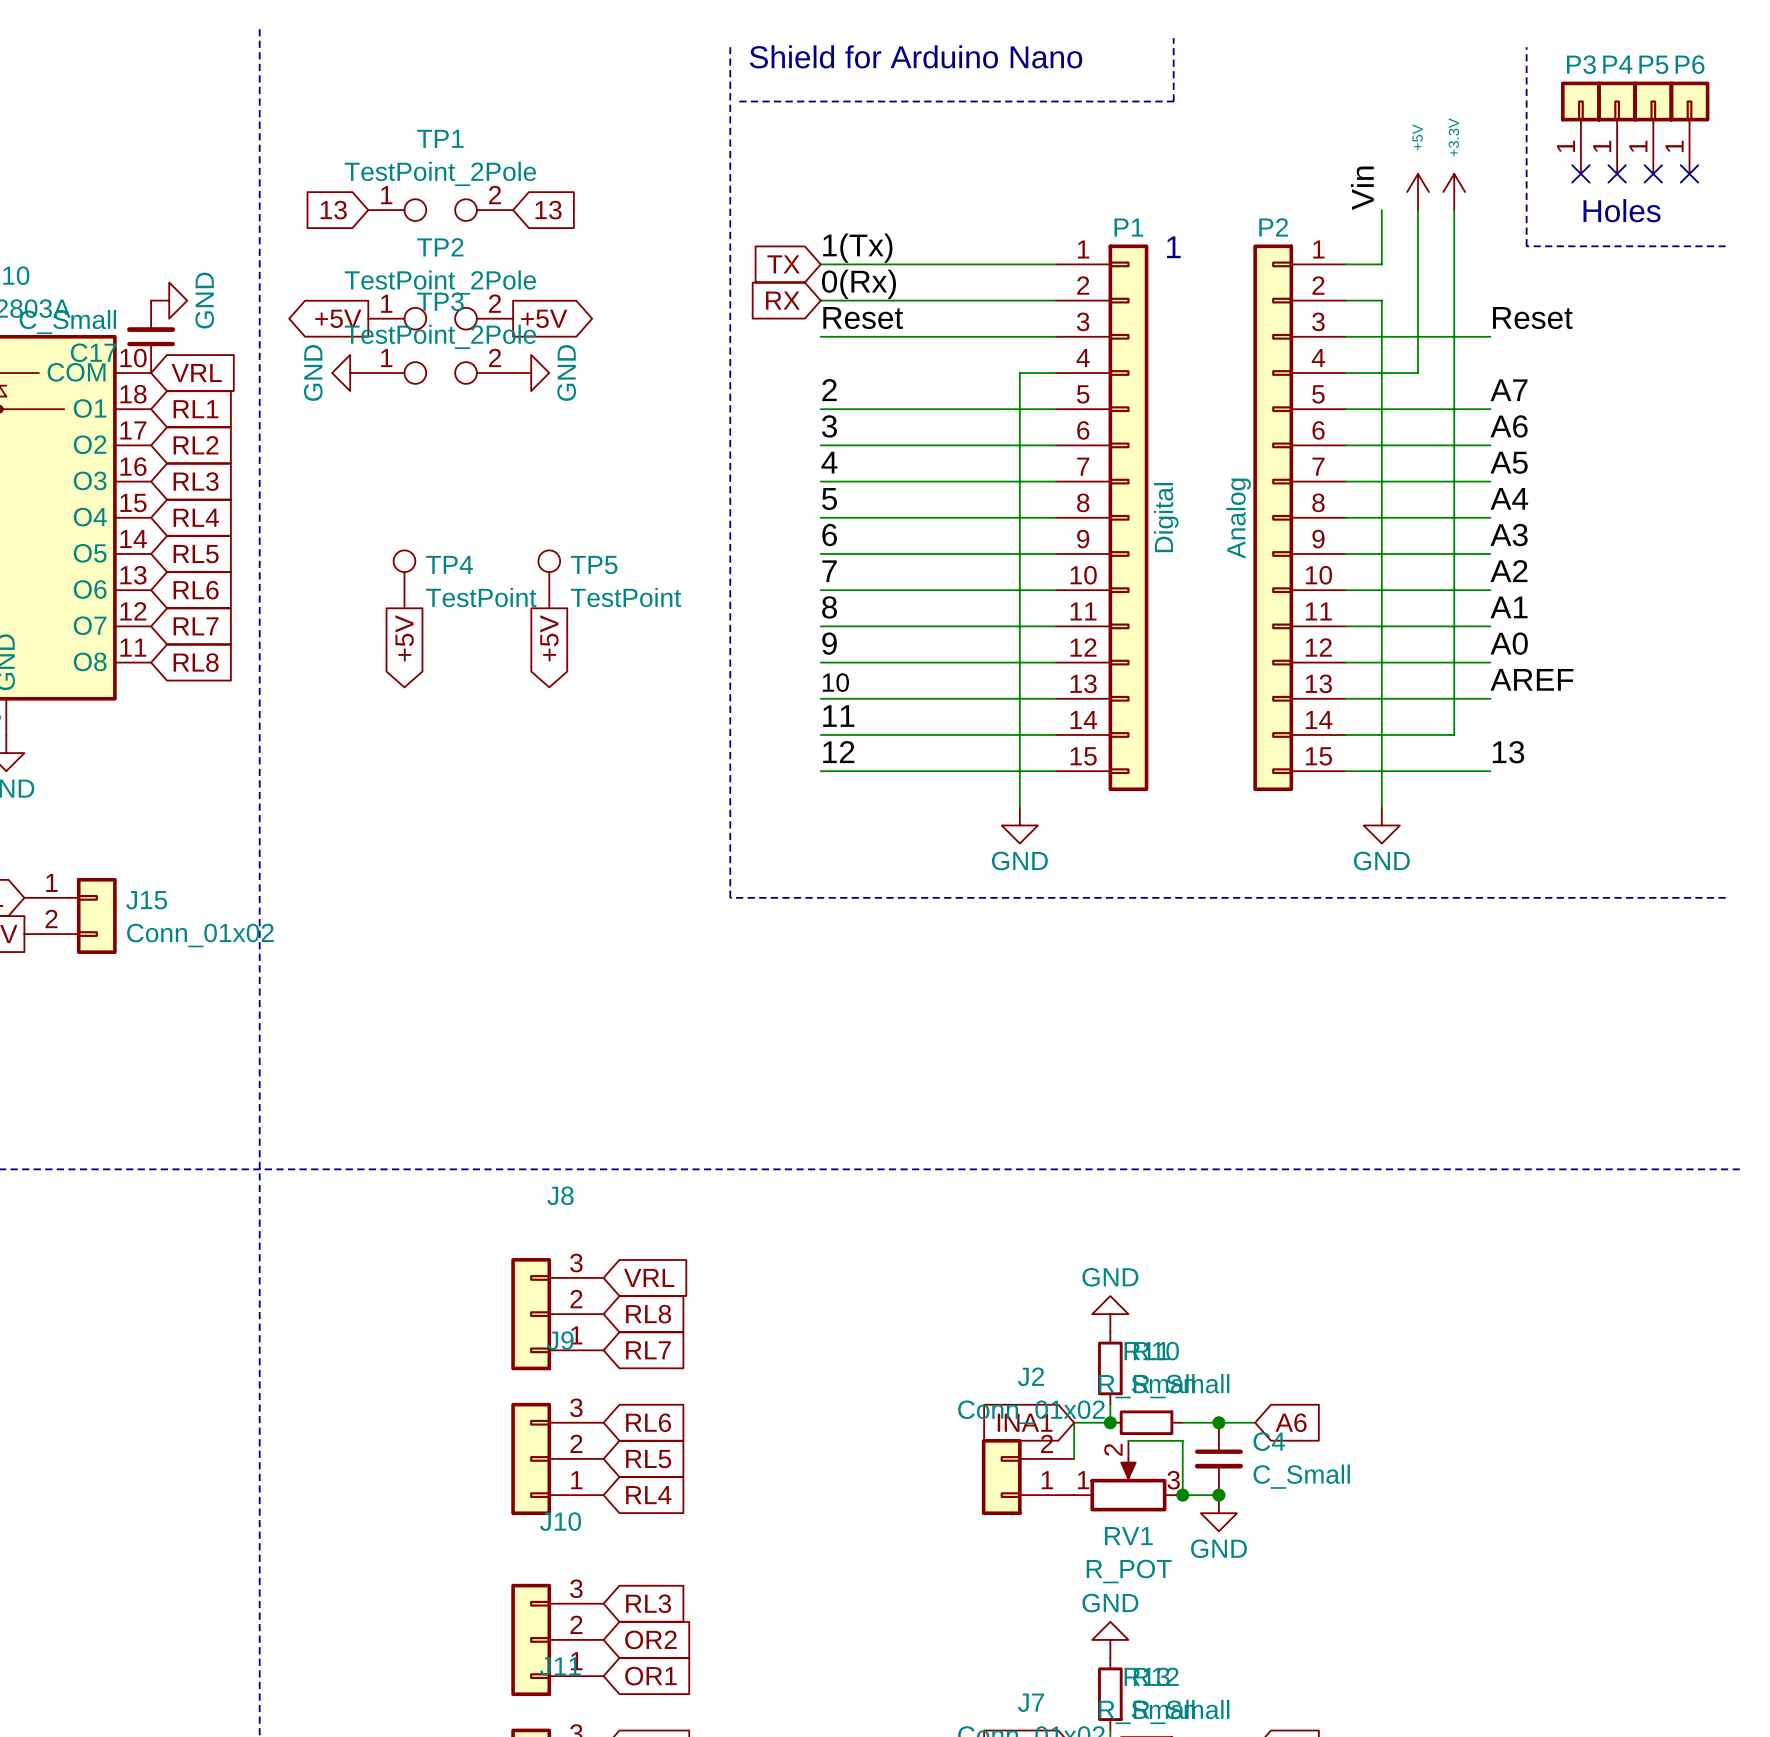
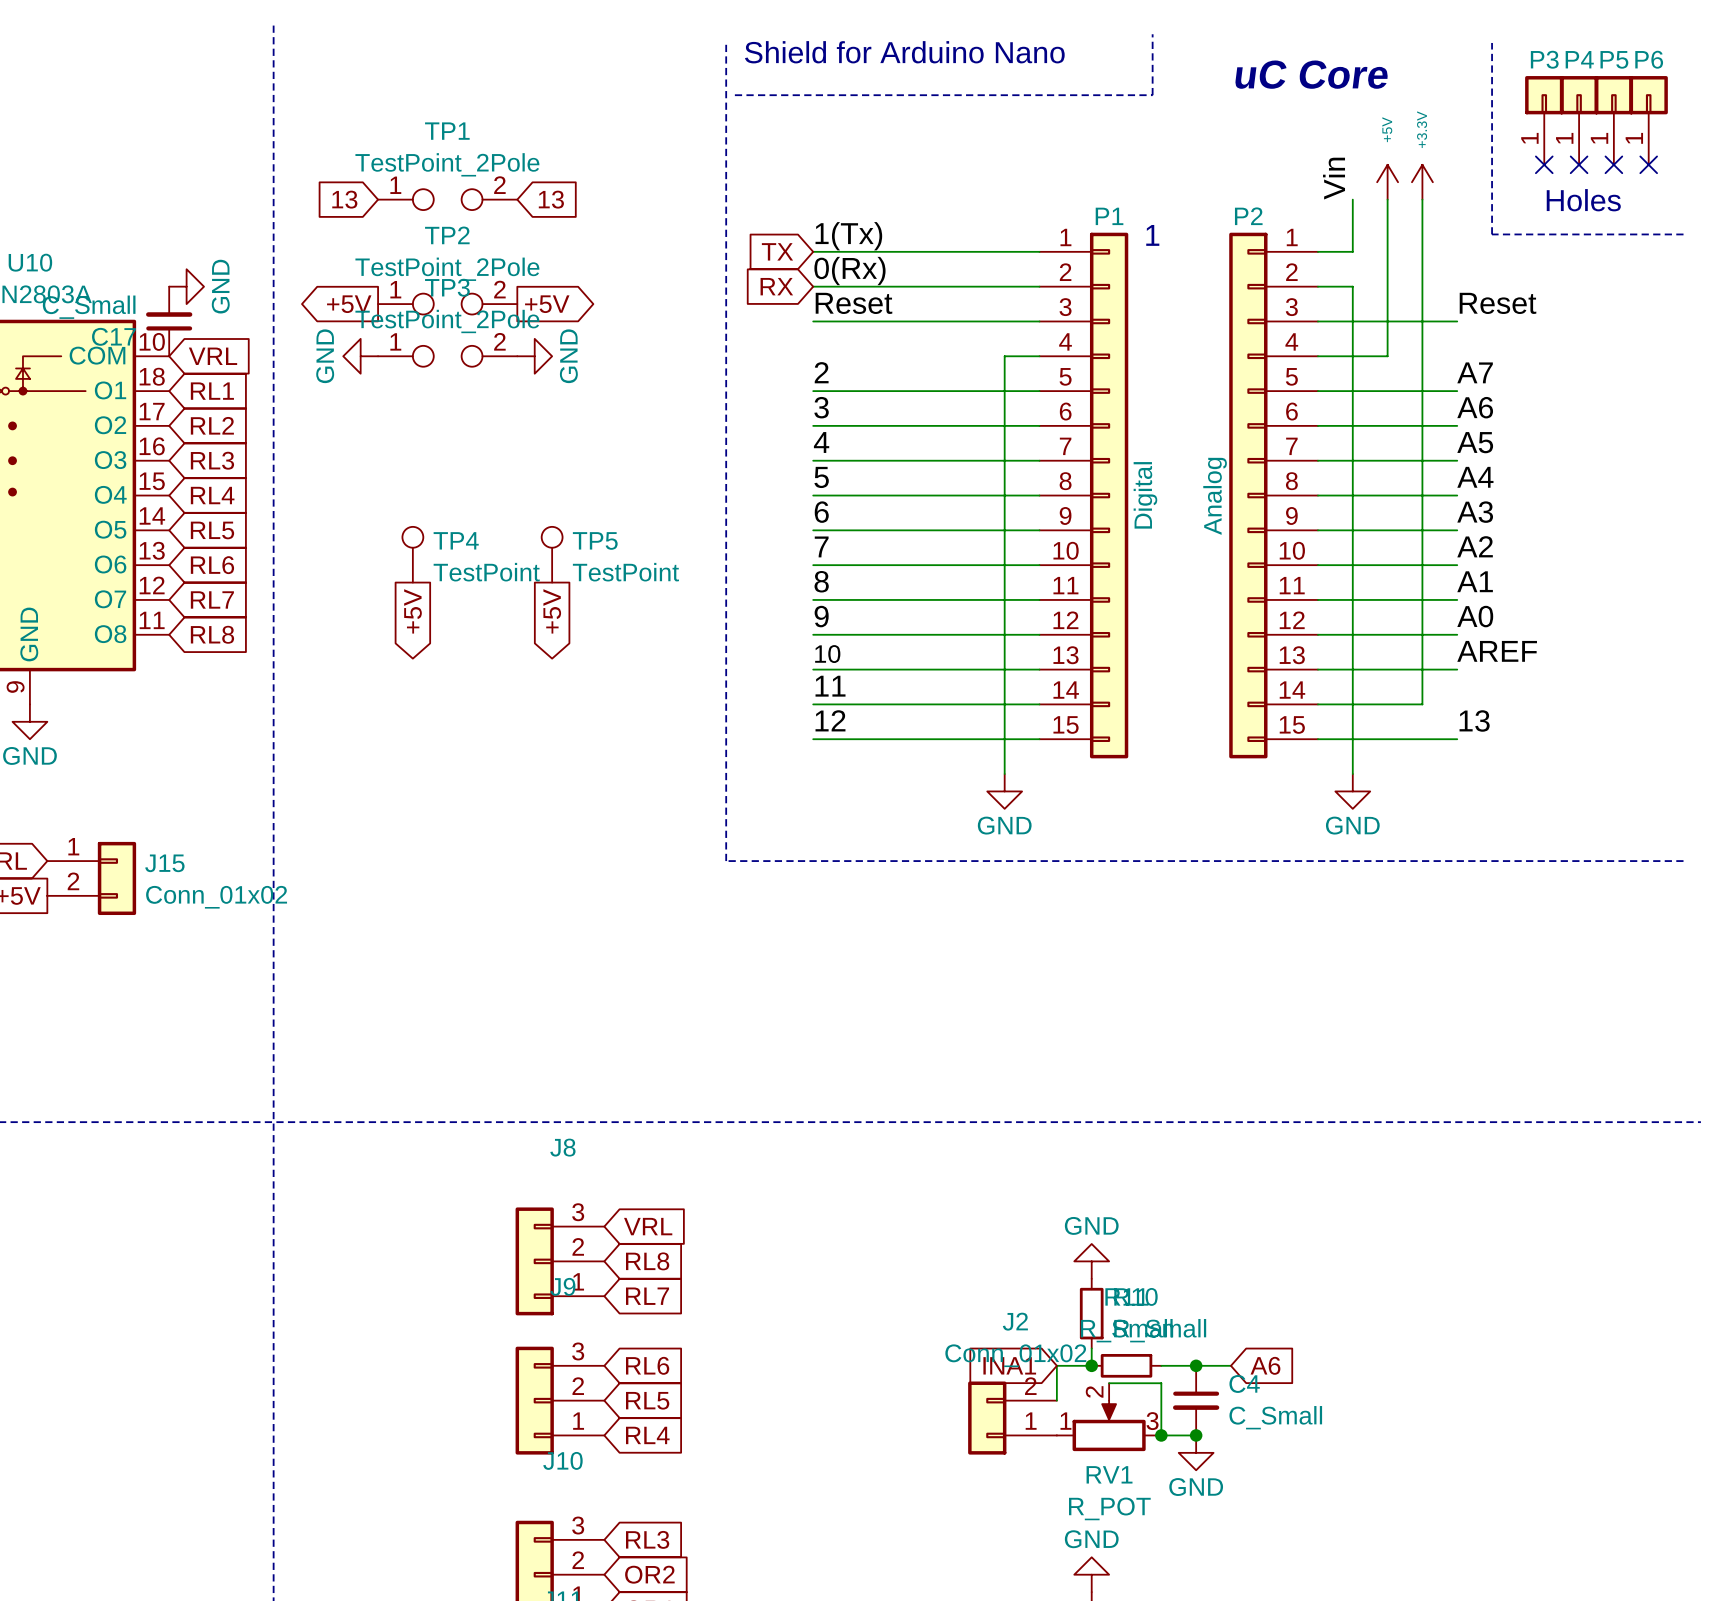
text: none -> uC Core (1311, 74)

